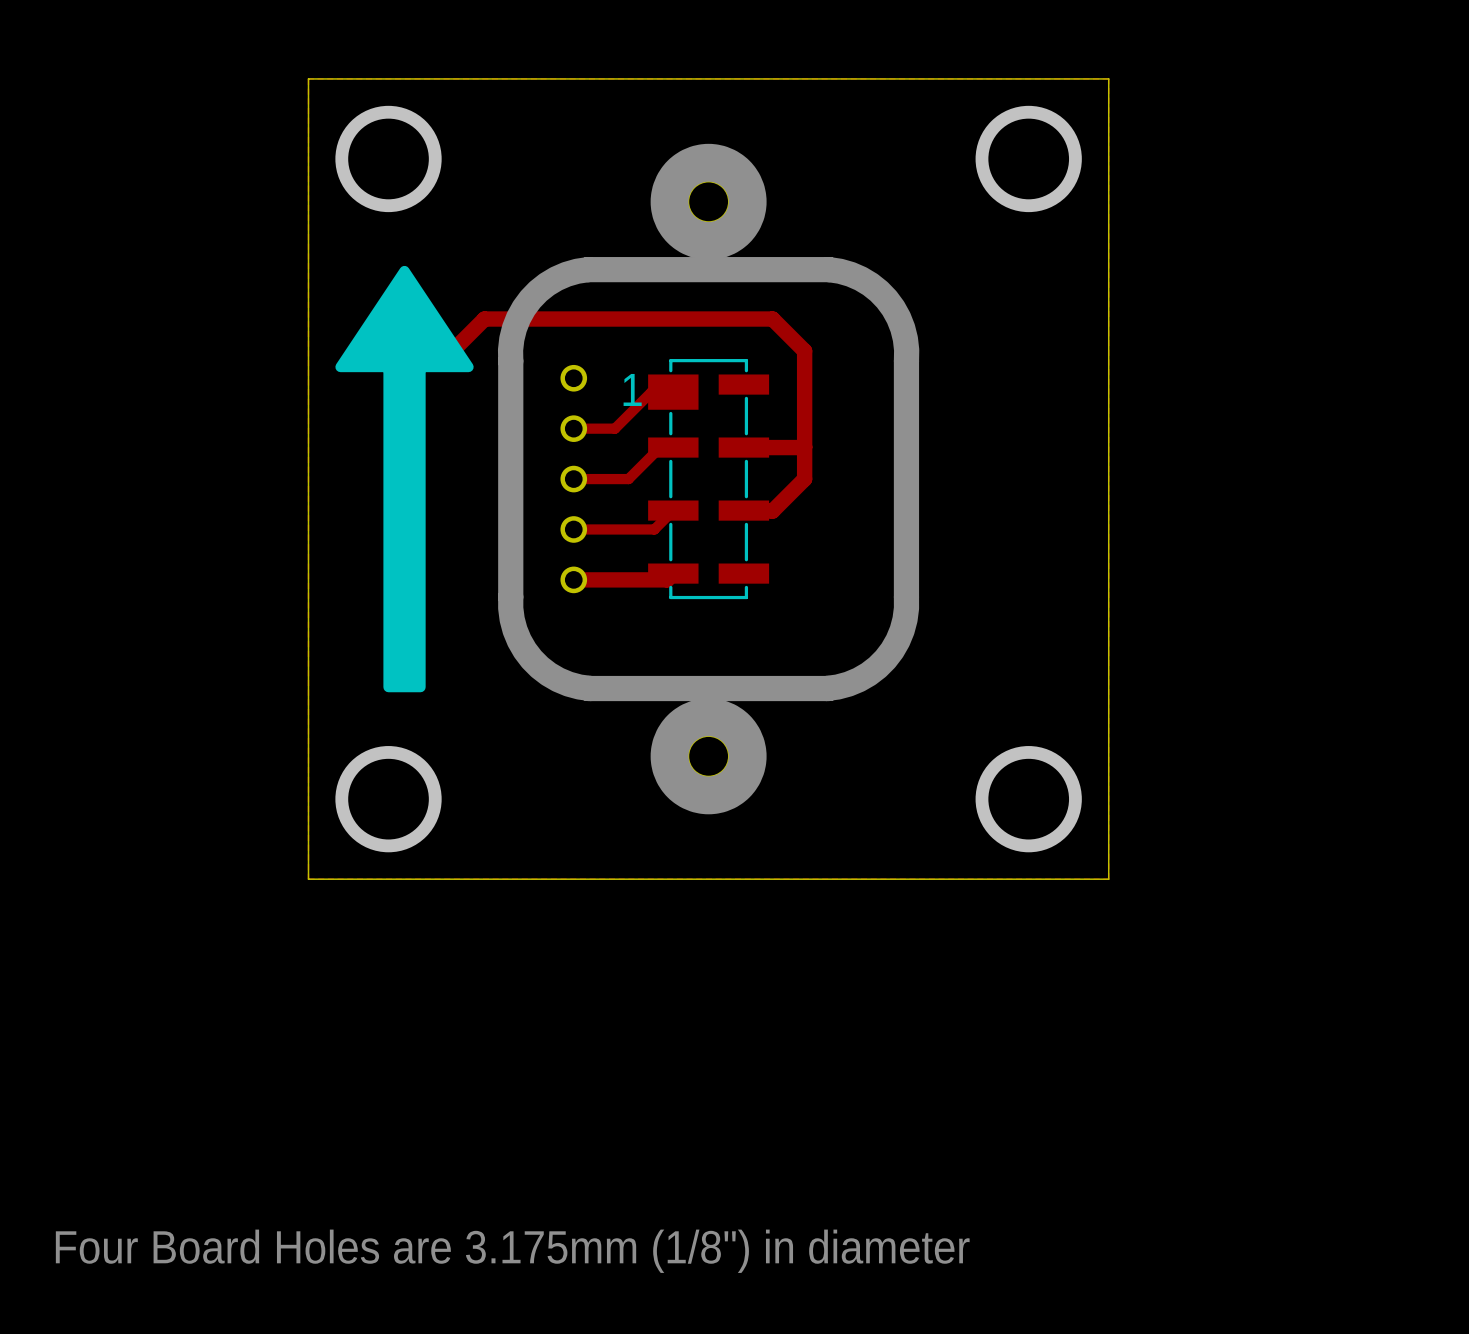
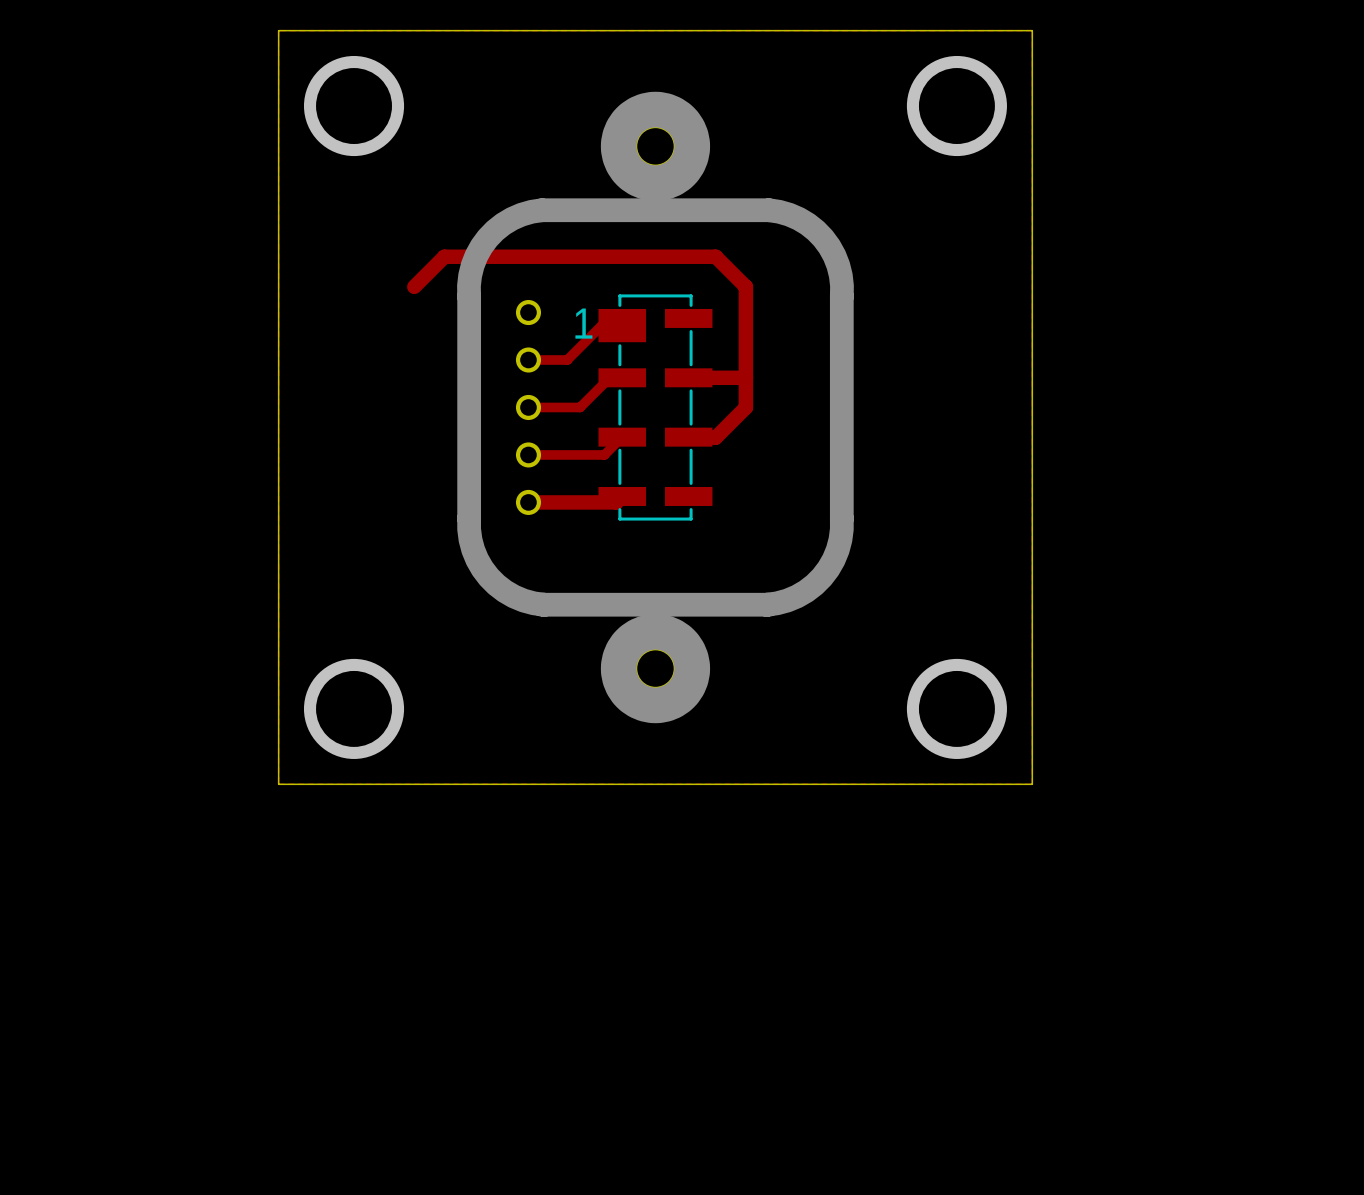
drawing: [335, 265, 474, 693] -> none
text: Four Board Holes are 3.175mm (1/8") in diameter (512, 1251) -> none

